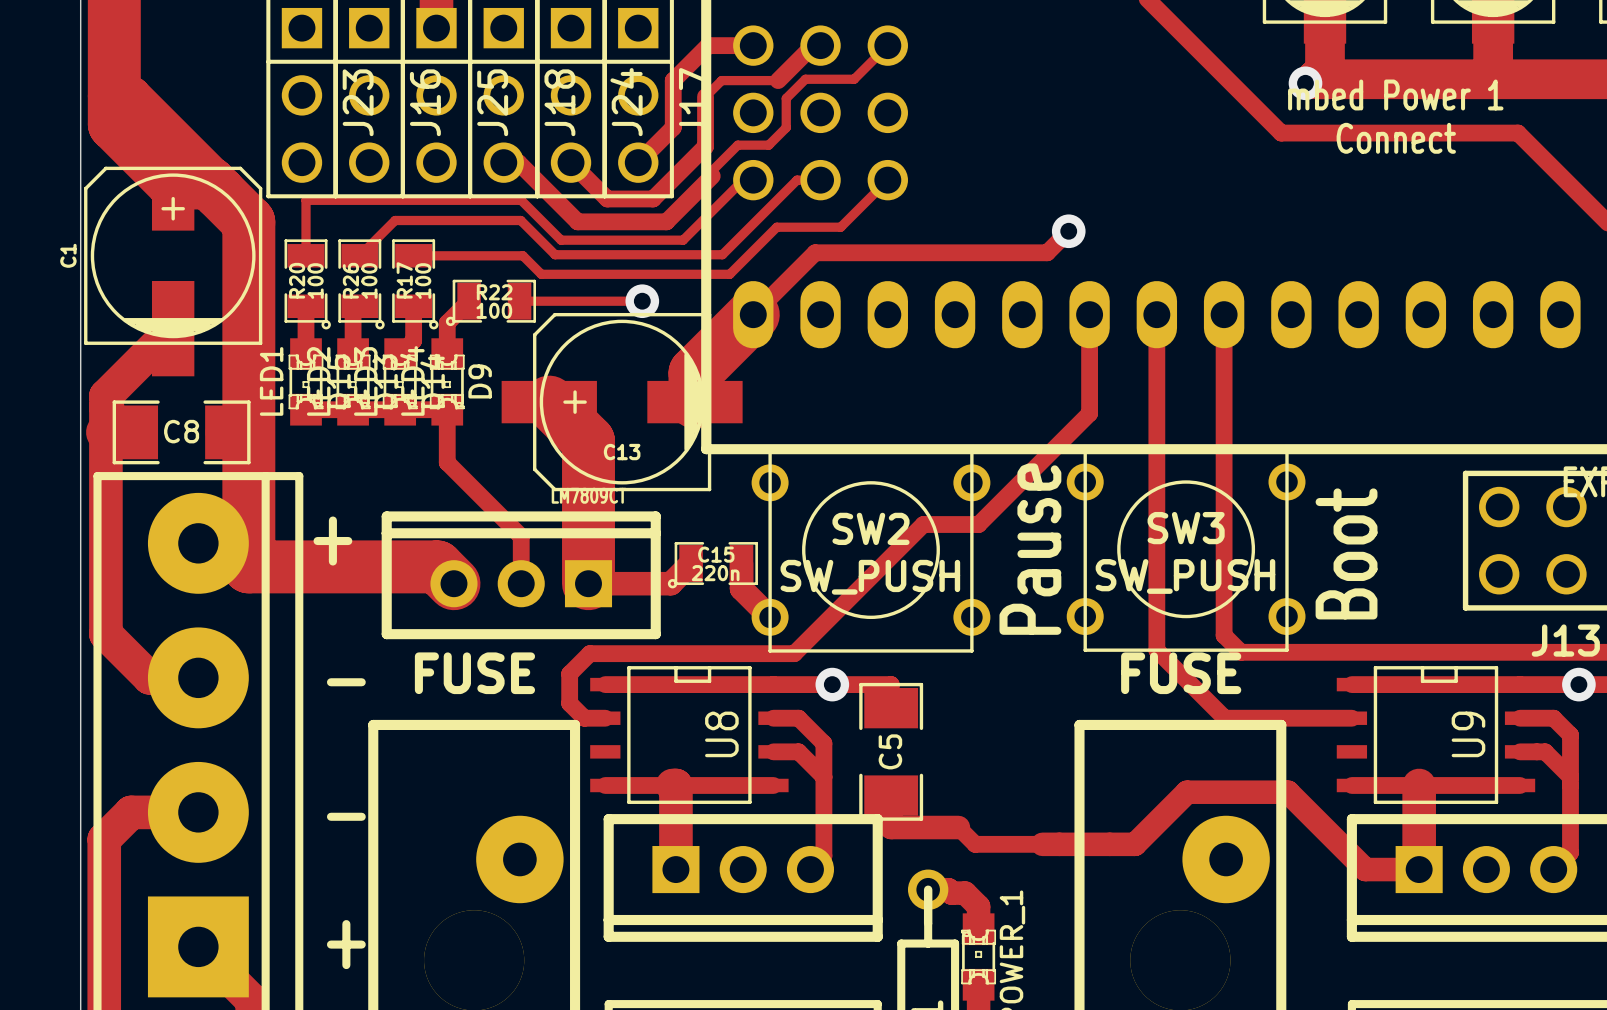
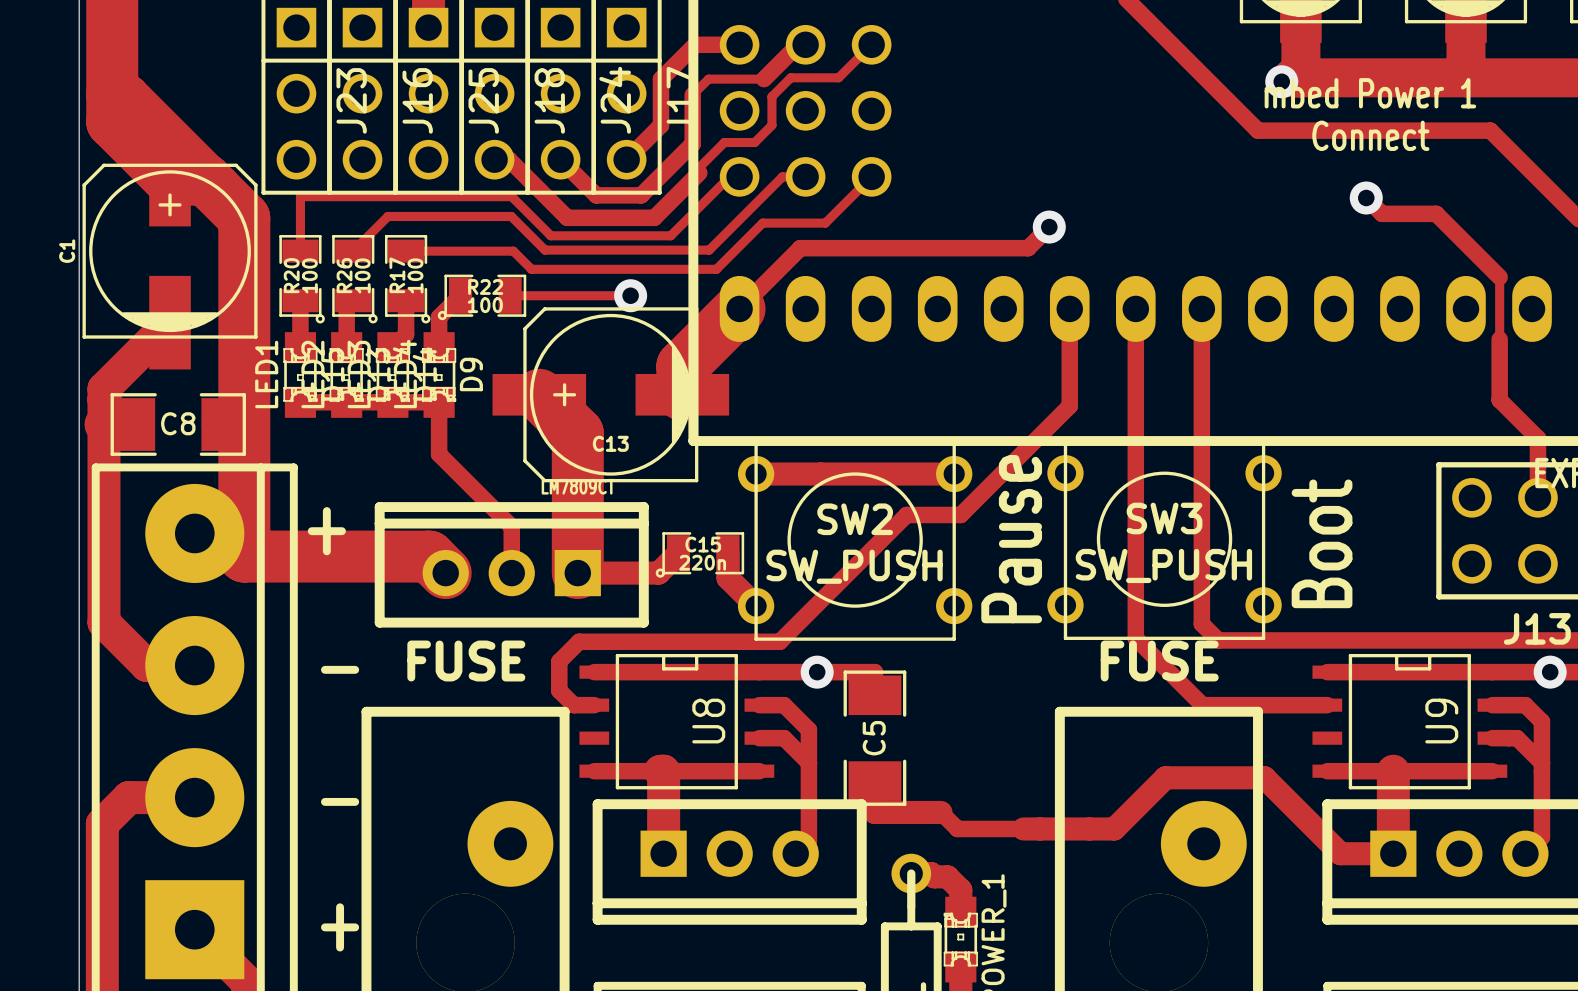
track: none -> (1366, 198) (1382, 213) (1436, 213) (1499, 277) (1499, 400) (1537, 438) (1537, 497)
via: none -> (1366, 198)
track: none -> (756, 474) (954, 474)

